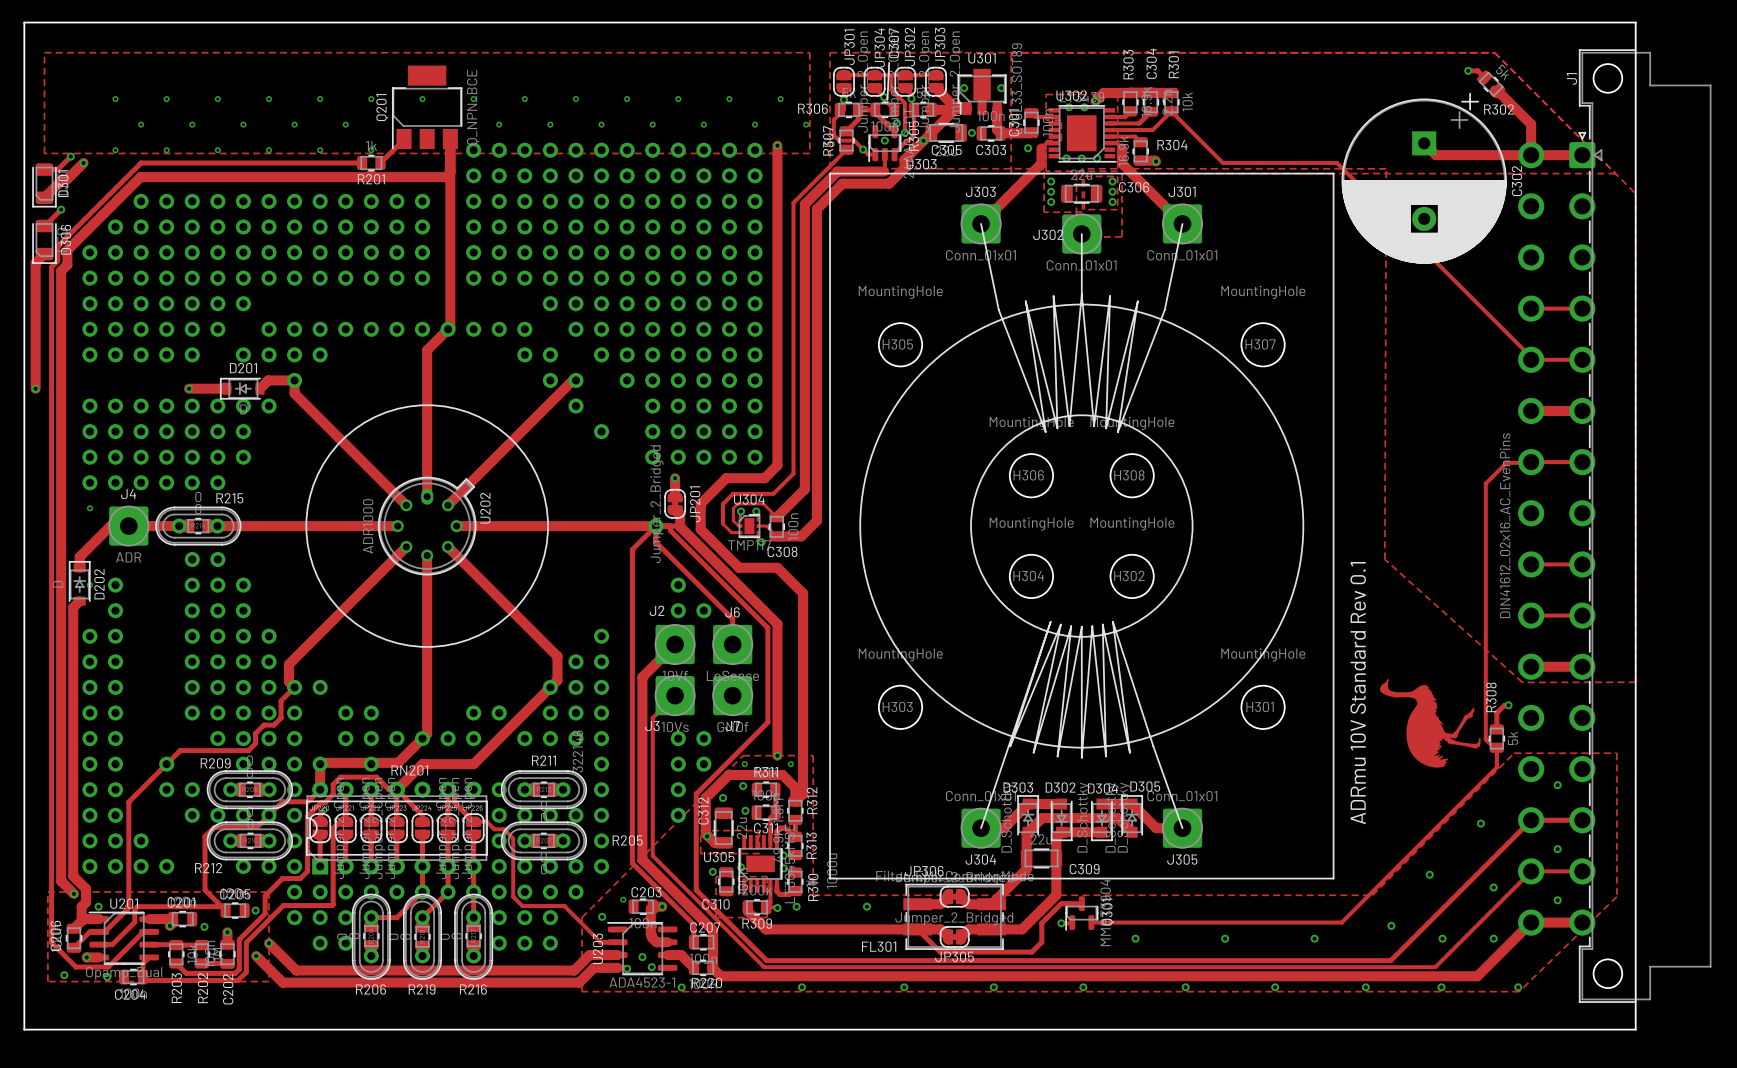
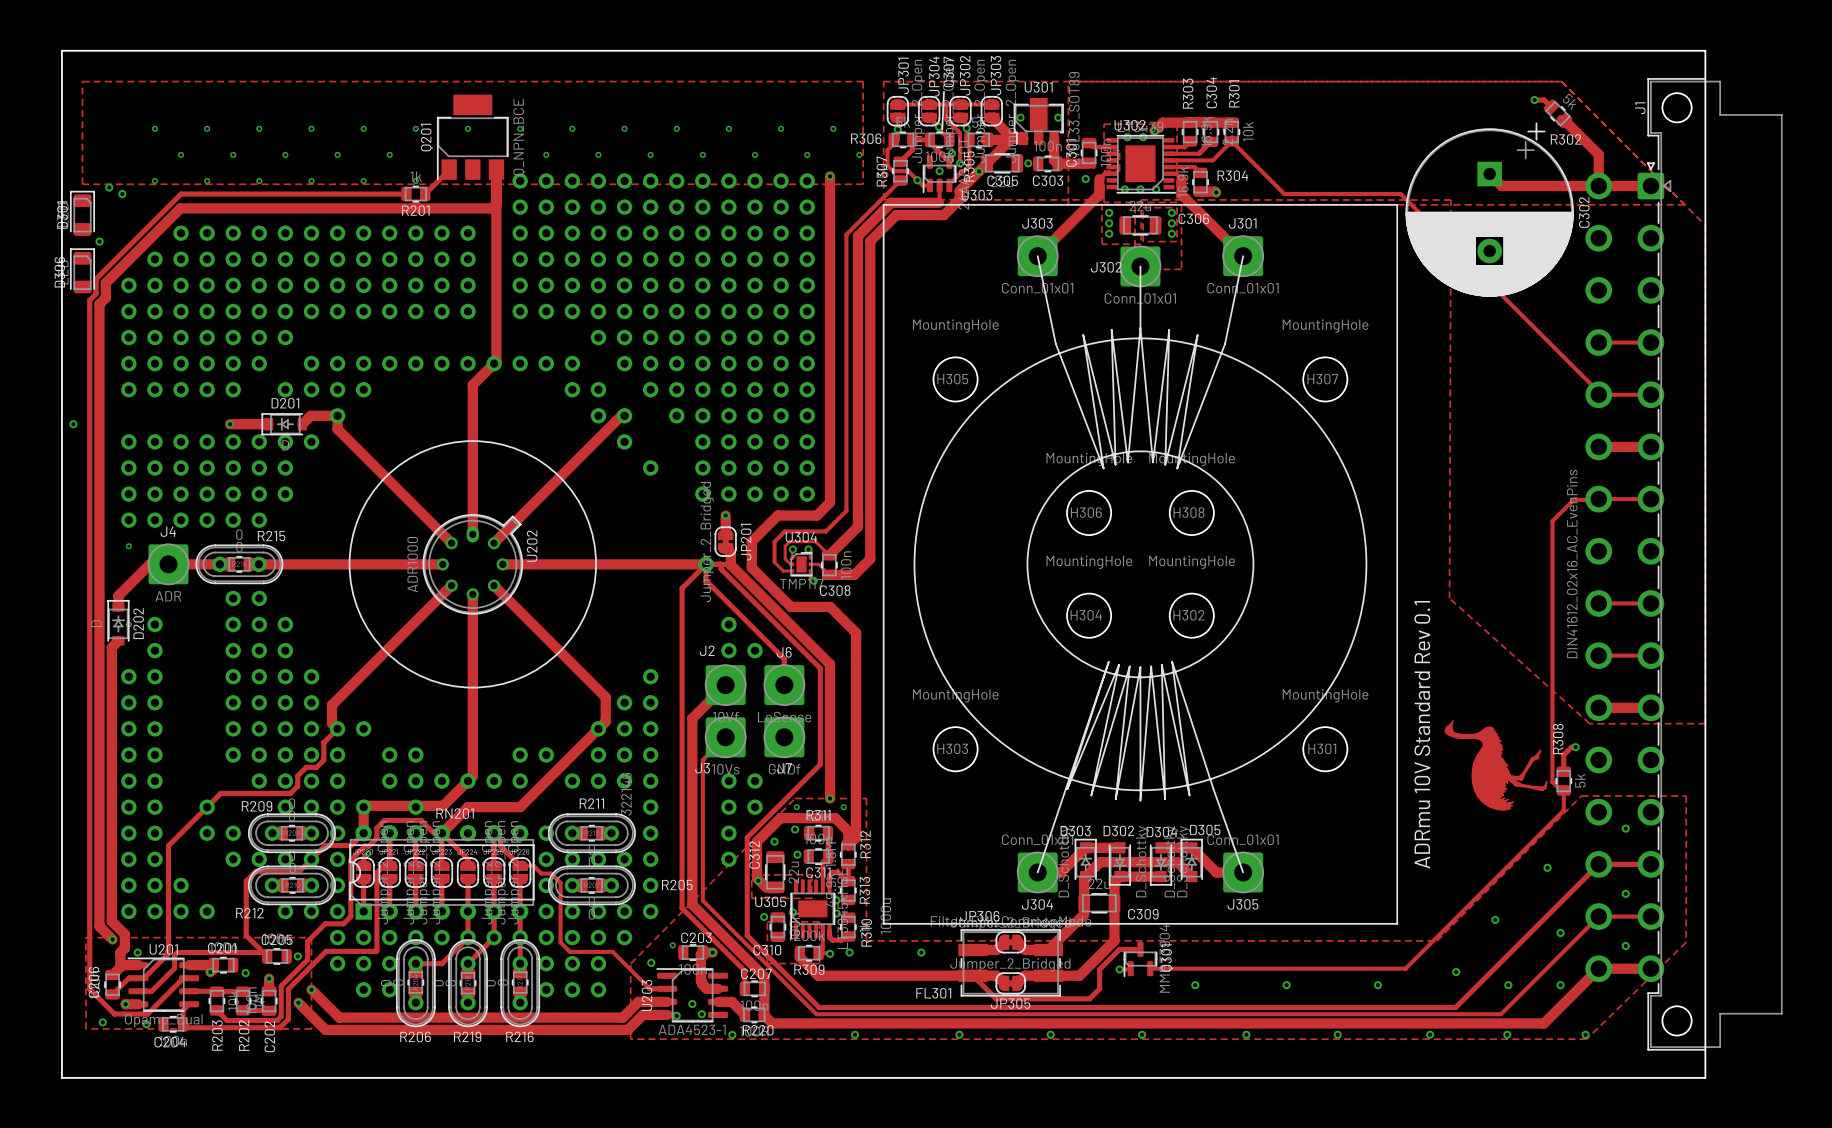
track: (70, 156) (57, 169) (44, 169) -> none
track: (83, 163) (67, 179) (63, 179) (44, 197) -> none
D301 rotation: 0° (44, 185) -> 180° (82, 213)
track: (61, 209) (44, 225) -> none
D306 rotation: 0° (44, 241) -> 180° (82, 270)
track: (44, 254) (35, 263) (35, 388) -> none

